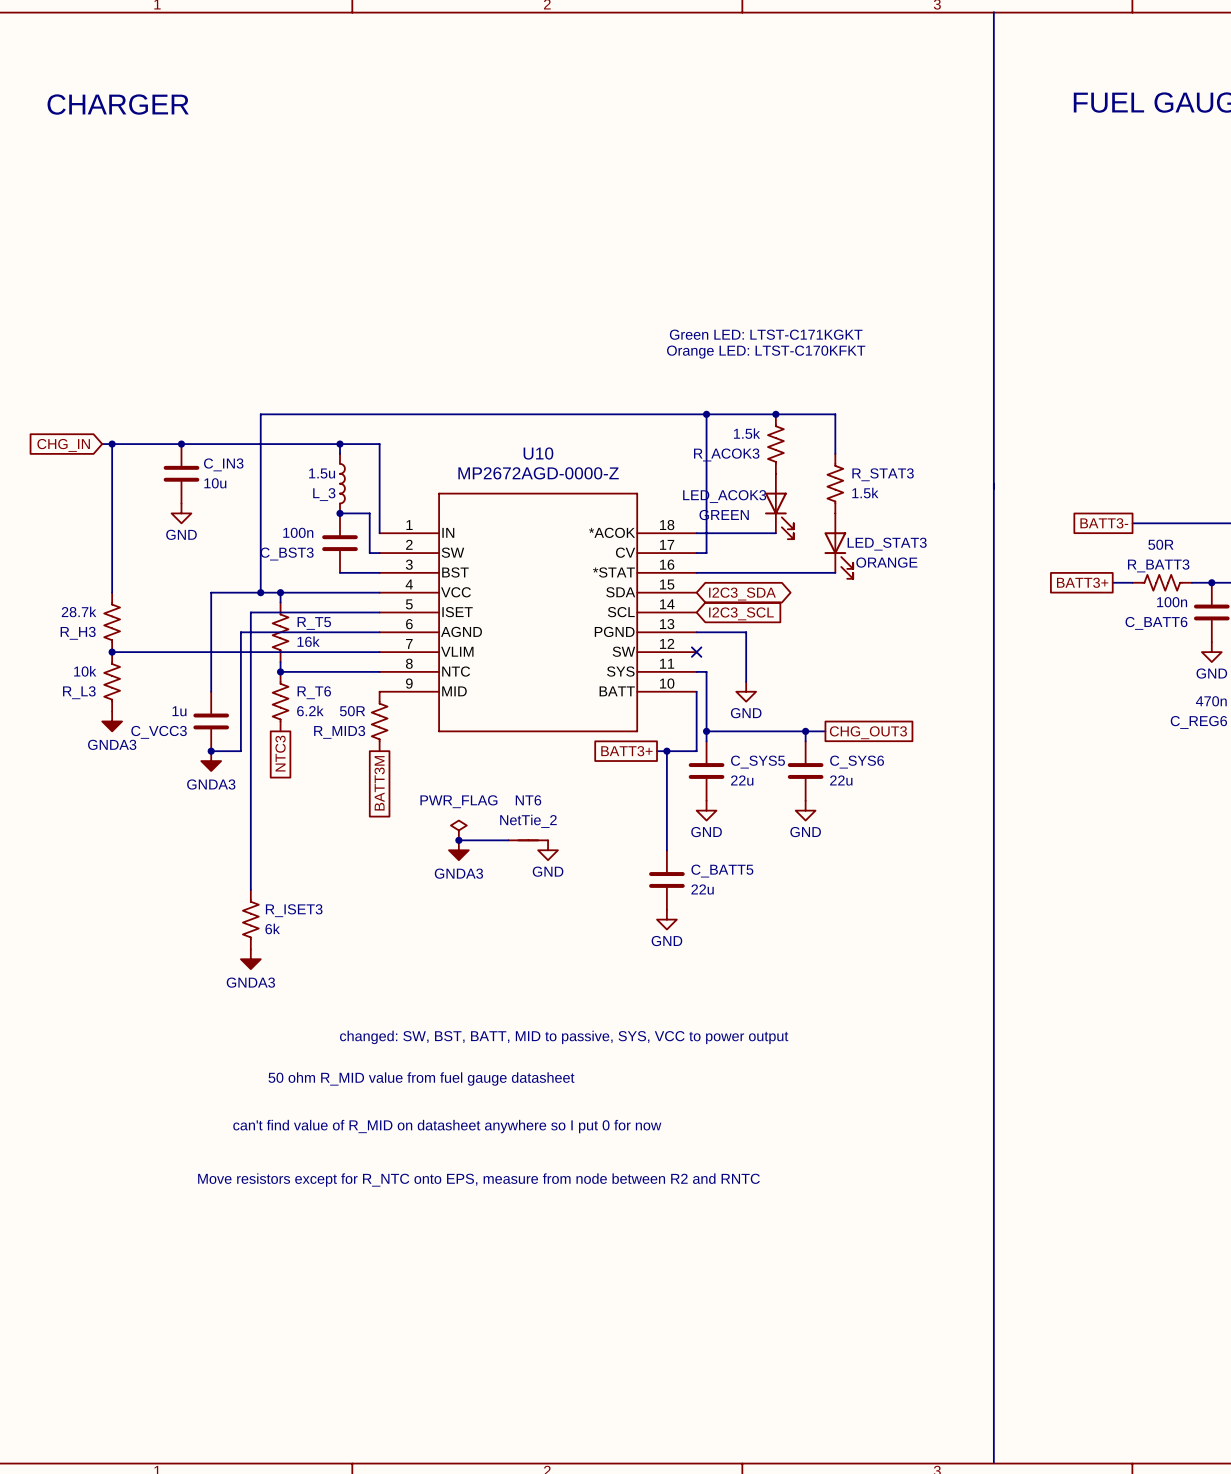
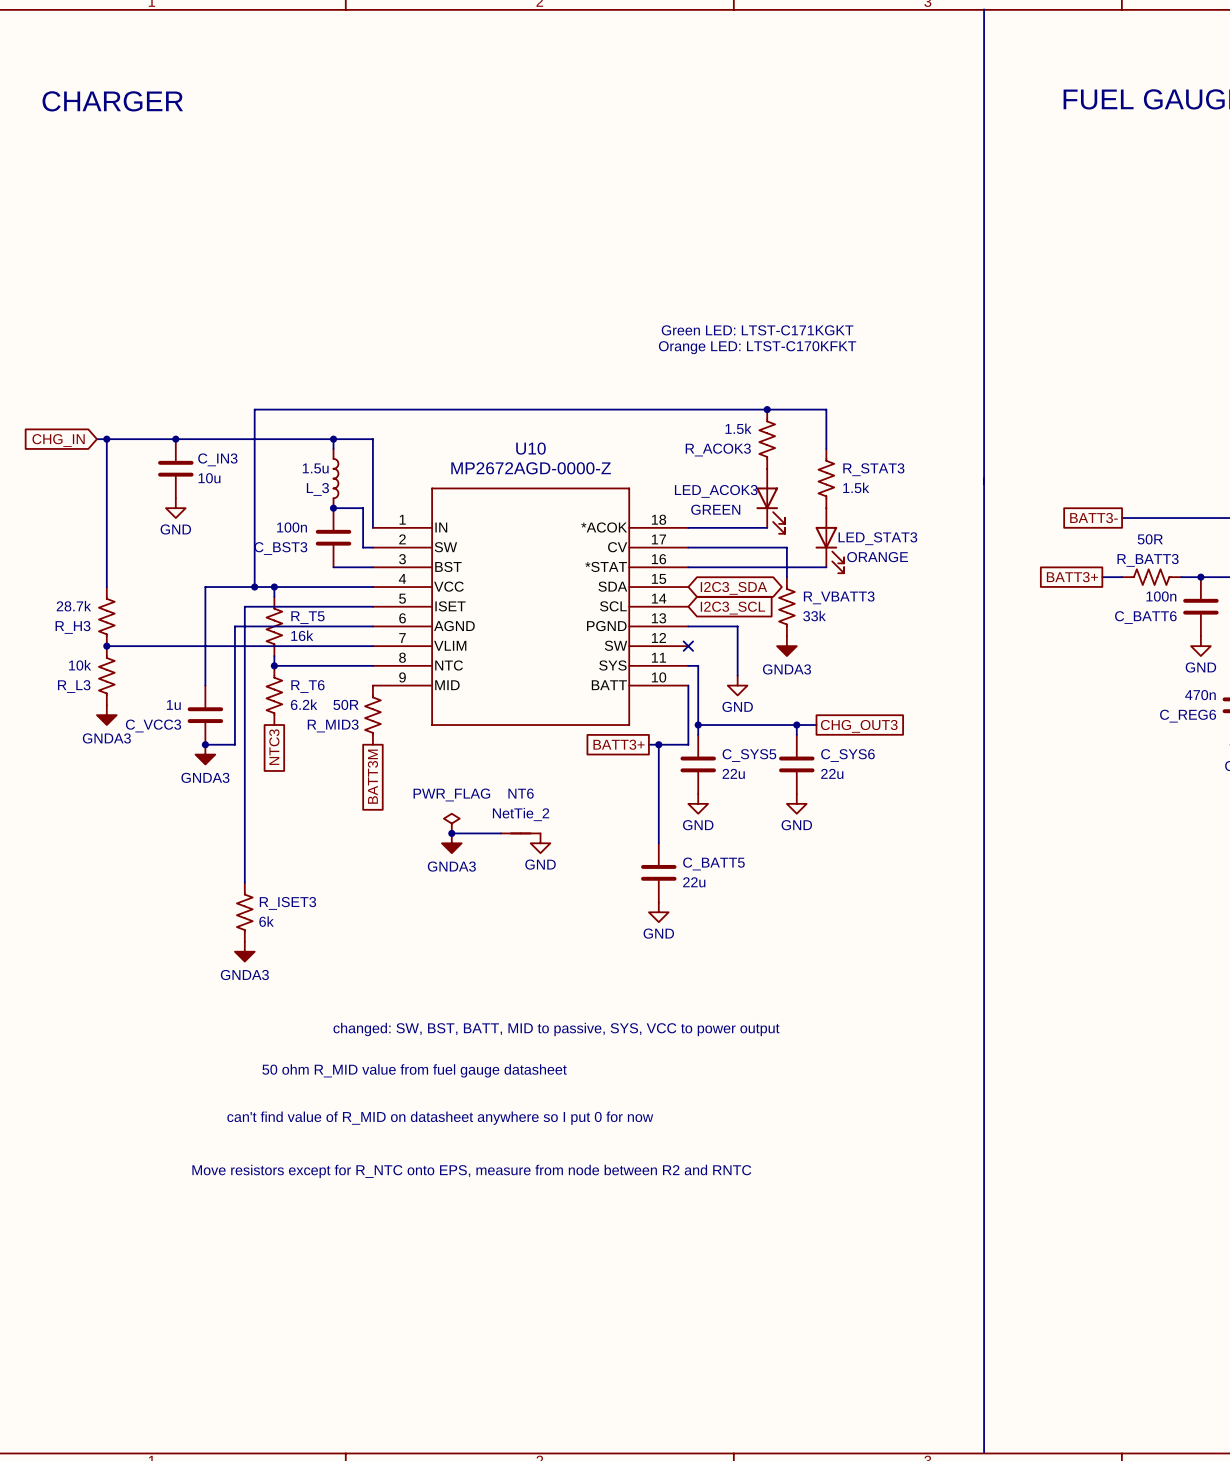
wire: (706, 414) (706, 553) -> (786, 577) (786, 547) (698, 547)
junction: (706, 414) -> none
R_VBATT3: none -> 33k (786, 606)
power symbol: none -> GNDA3 (786, 646)

